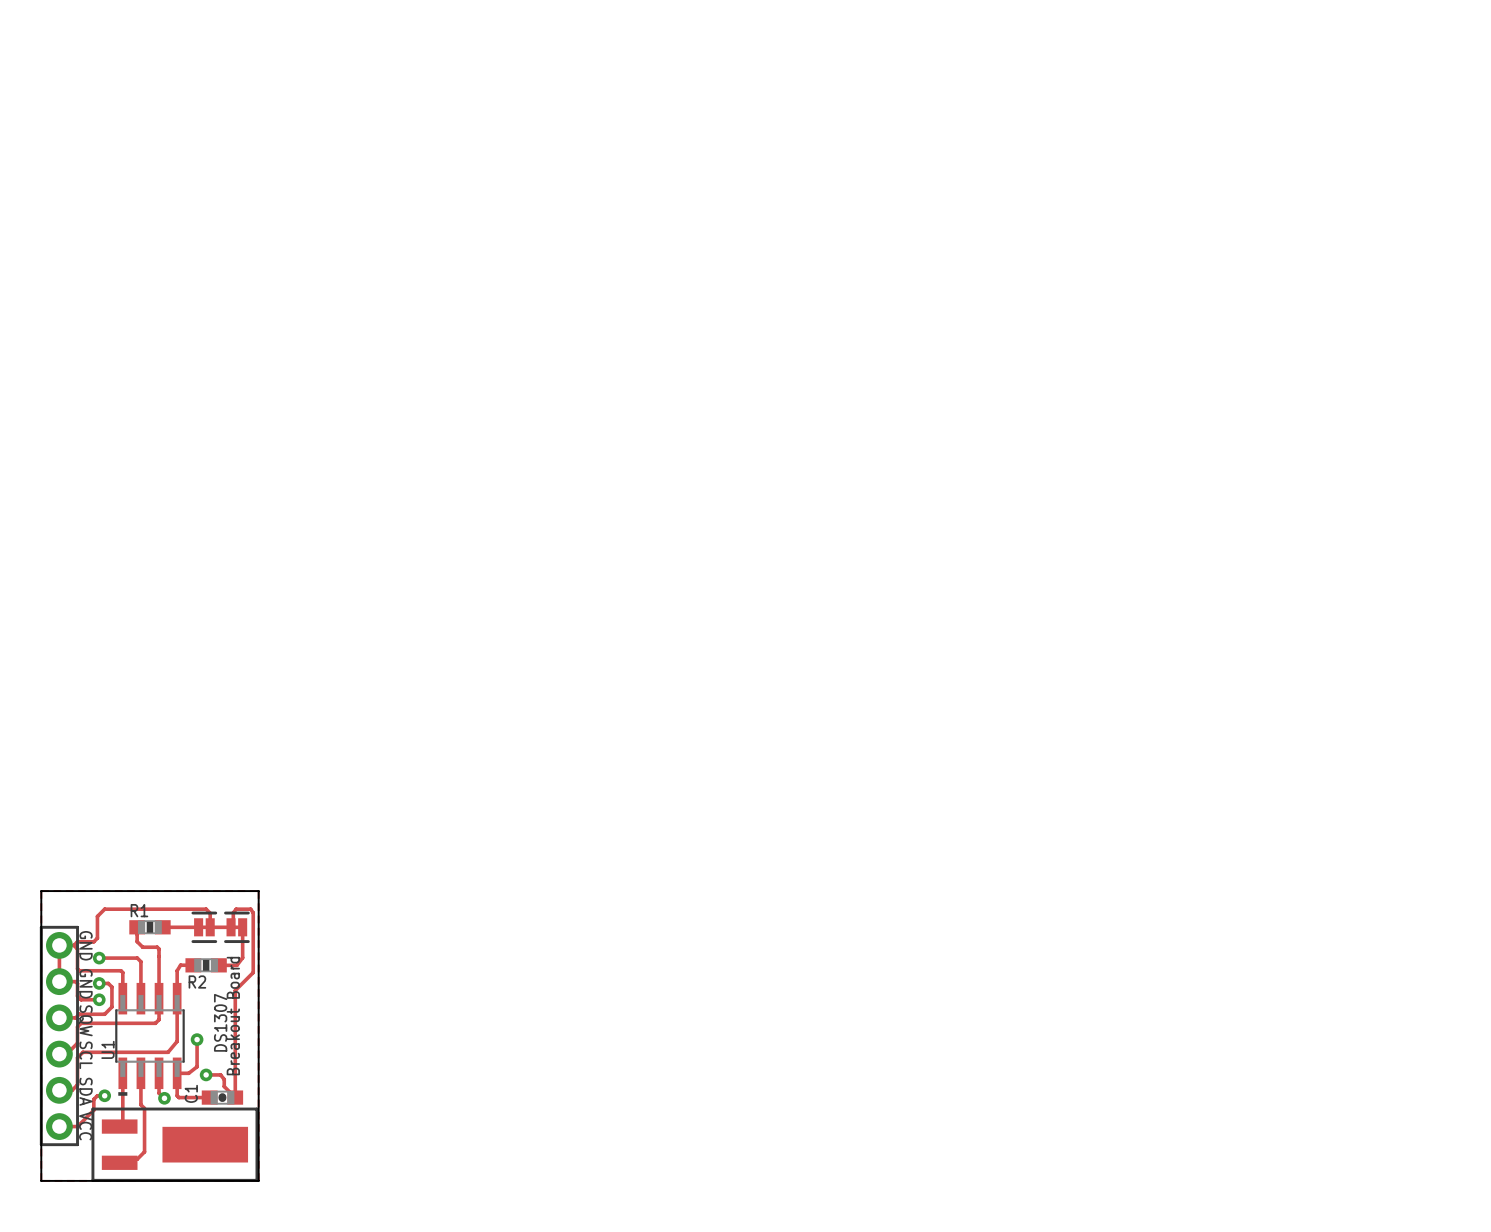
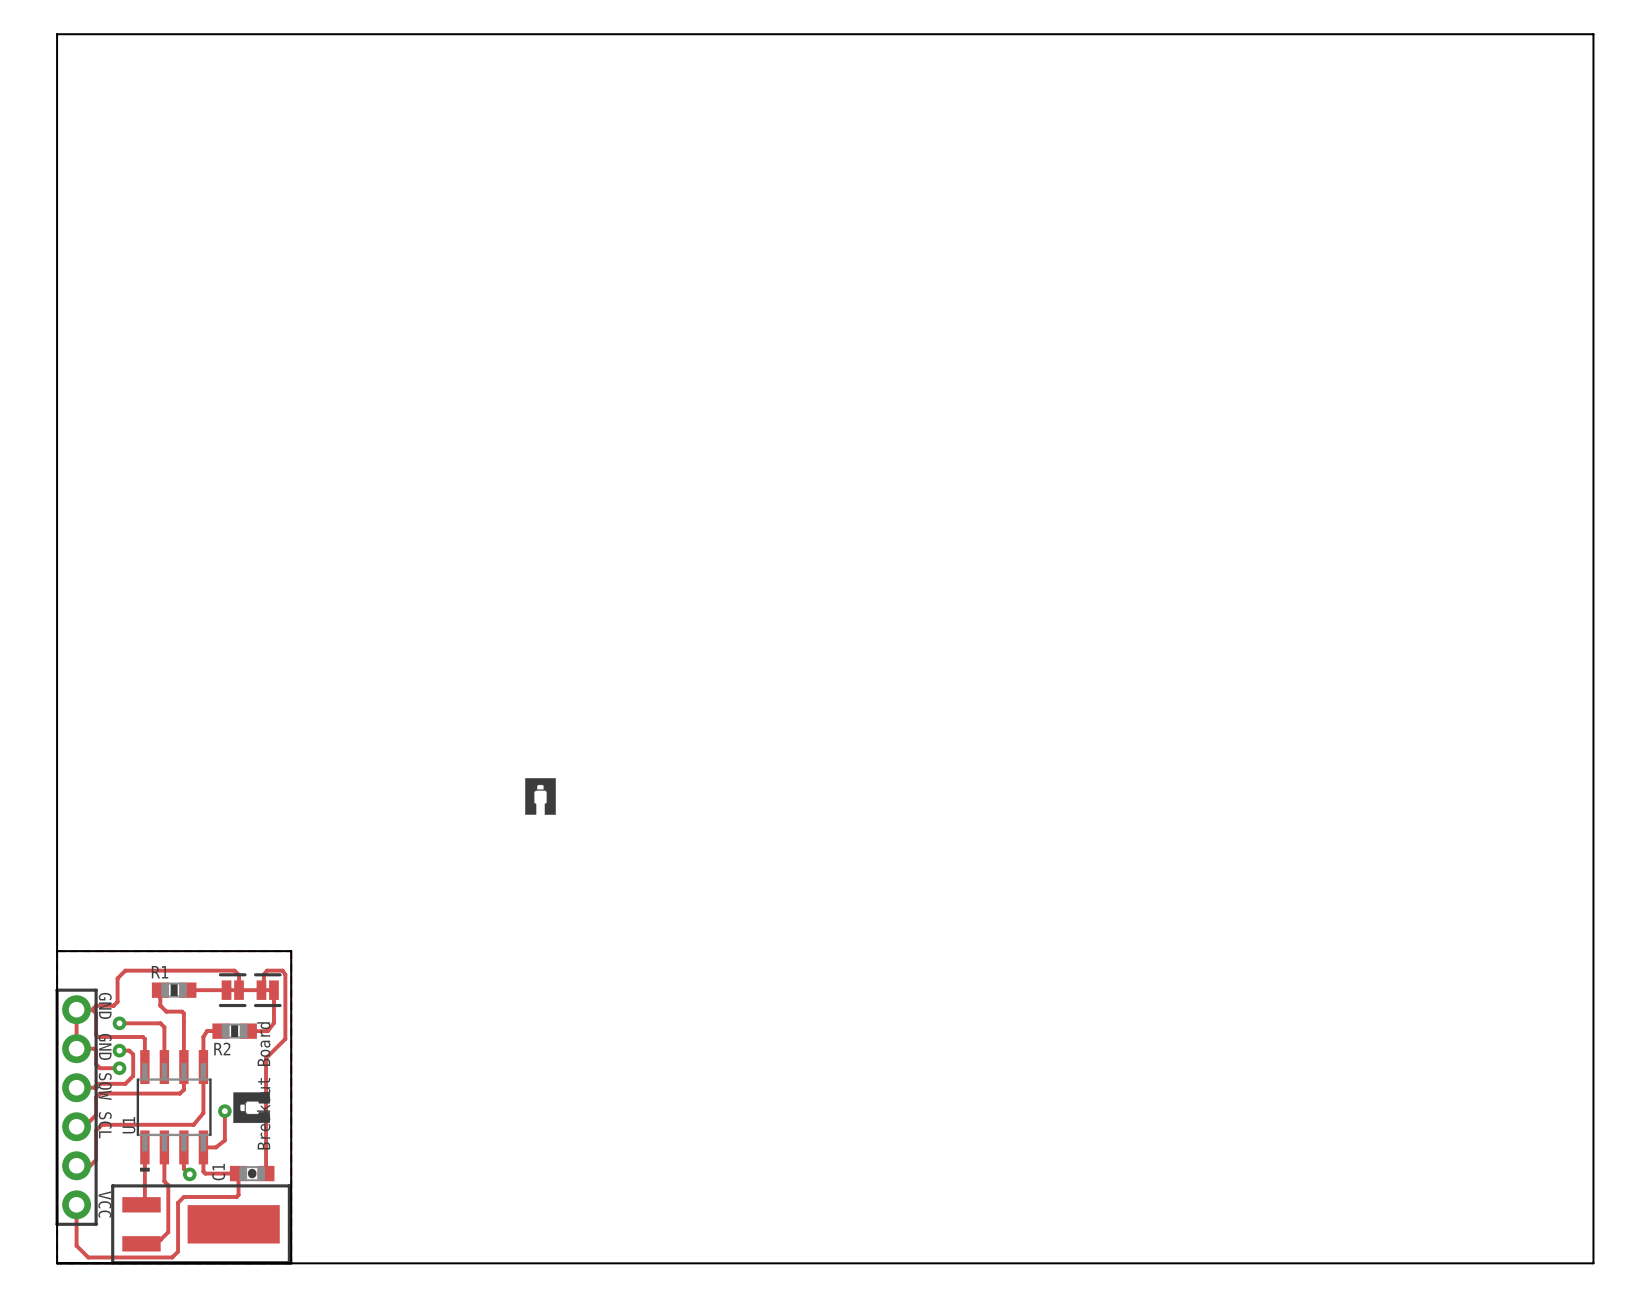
drawing: none -> [525, 778, 556, 815]
board edge: none -> (57, 951) (57, 34) (1593, 34) (1593, 1263) (57, 1263)
drawing: none -> [233, 1092, 271, 1124]
text: DS1307 (220, 1022) -> none
track: (206, 1074) (220, 1074) (224, 1079) (224, 1086) (235, 1097) -> none
via: (206, 1074) -> none
text: SDA (86, 1091) -> none
track: (104, 1095) (97, 1095) (93, 1099) (93, 1110) (77, 1126) (59, 1126) -> (238, 1173) (238, 1195) (236, 1196) (183, 1196) (178, 1202) (178, 1251) (172, 1257) (88, 1257) (76, 1245) (76, 1204)
via: (104, 1095) -> none

